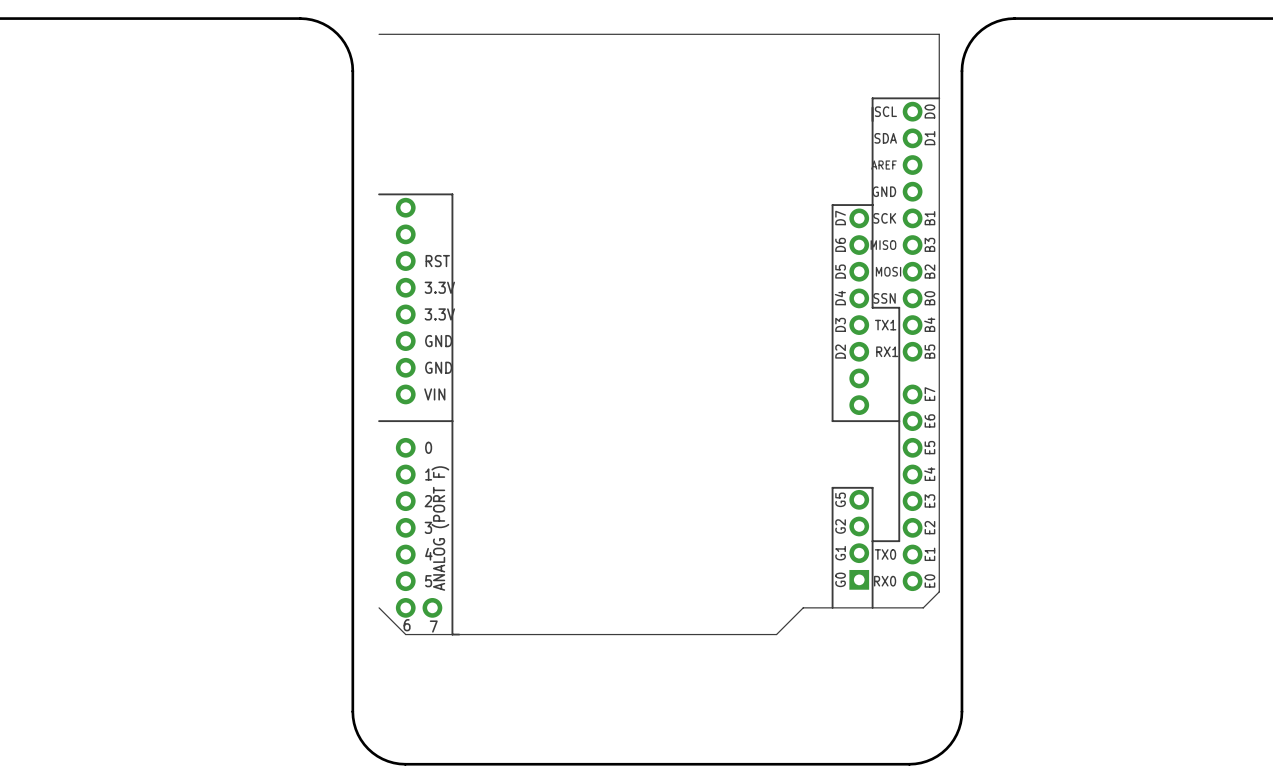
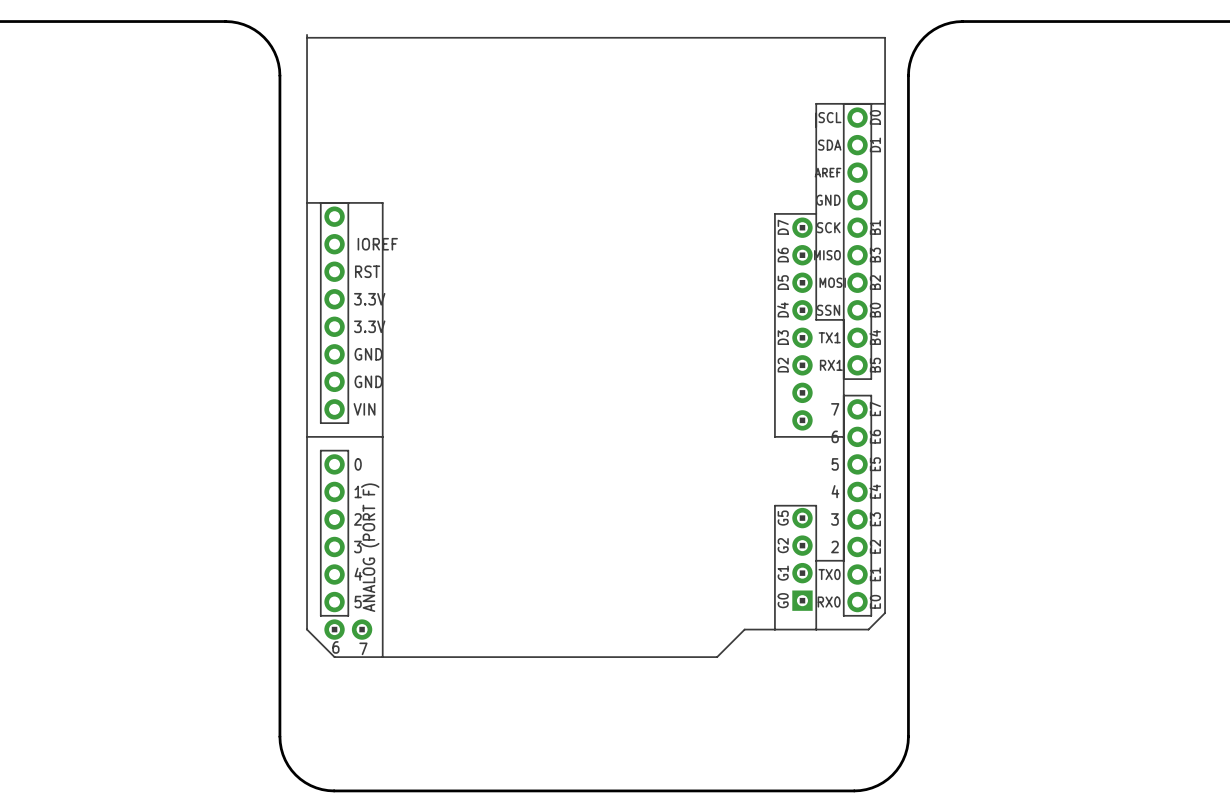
part footprint: [378, 33, 941, 636] -> [306, 34, 886, 658]

